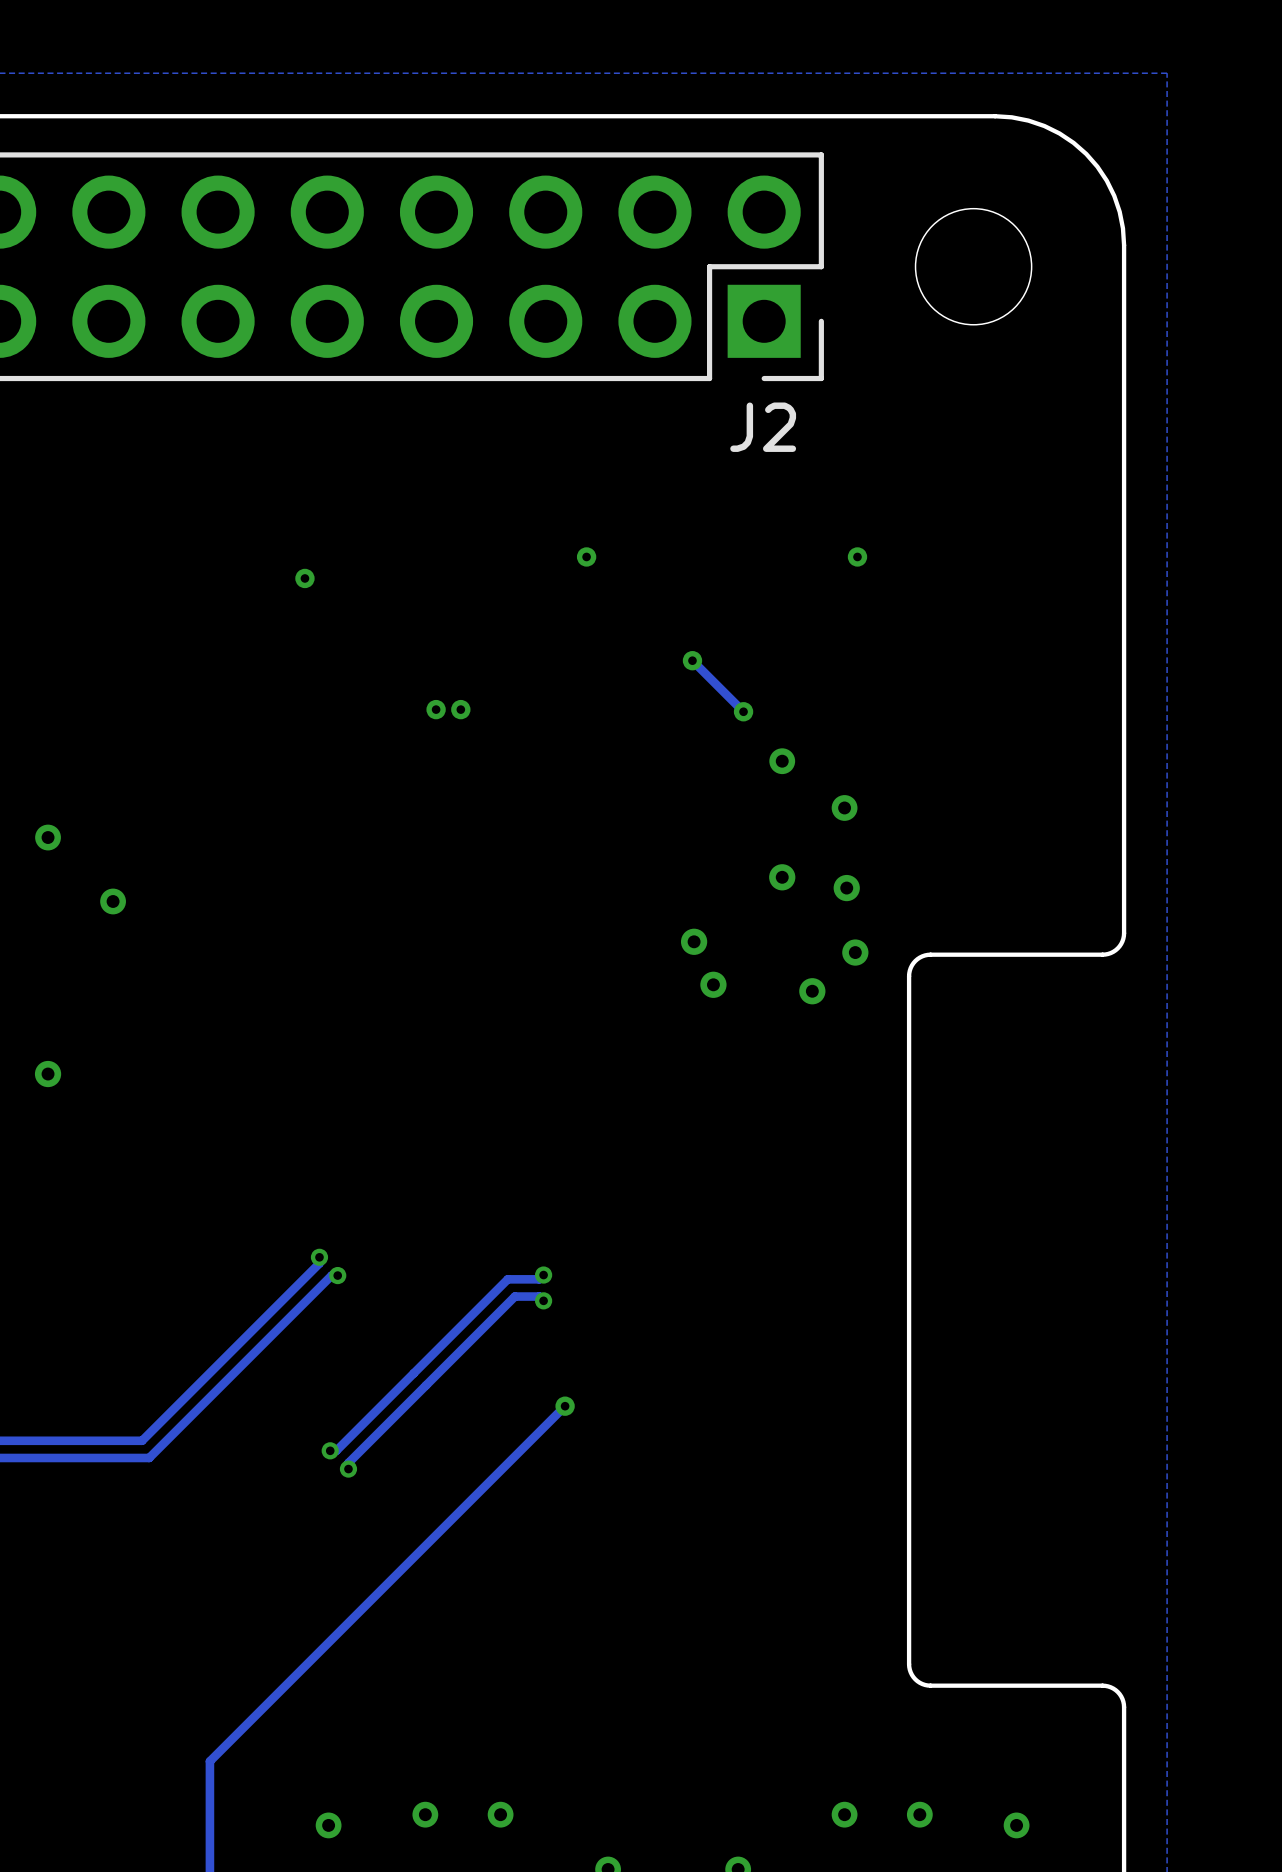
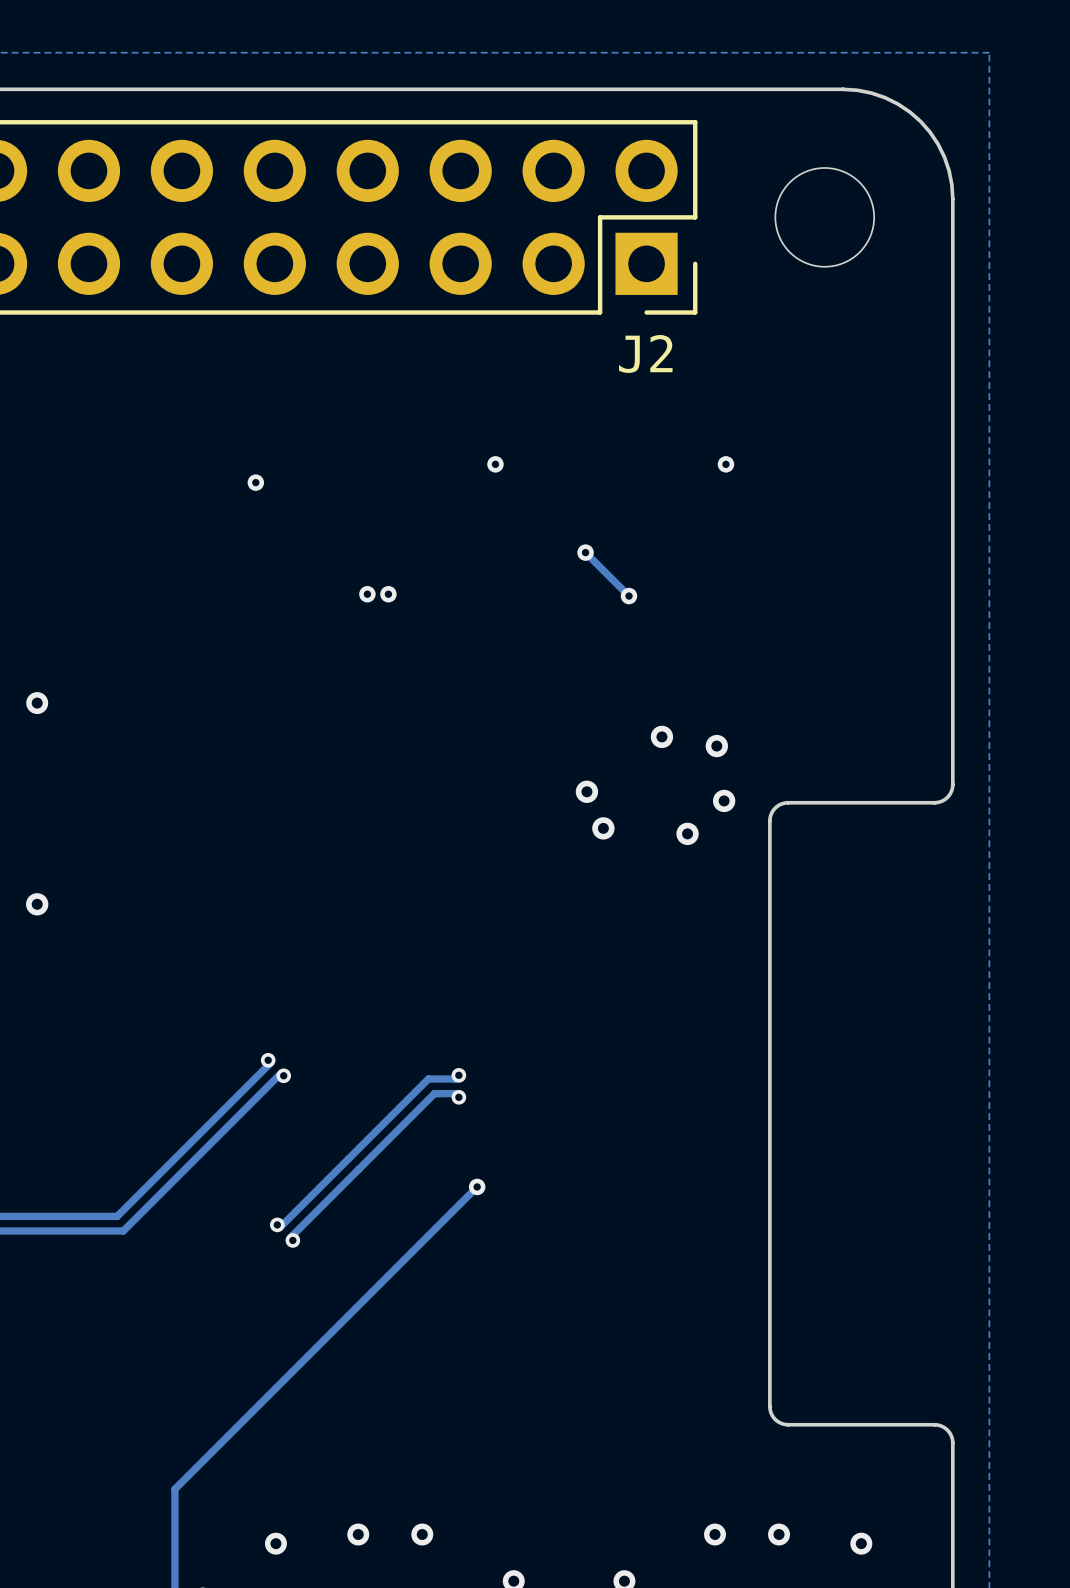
via: (782, 761) -> none
via: (844, 807) -> none
via: (113, 901) -> none

